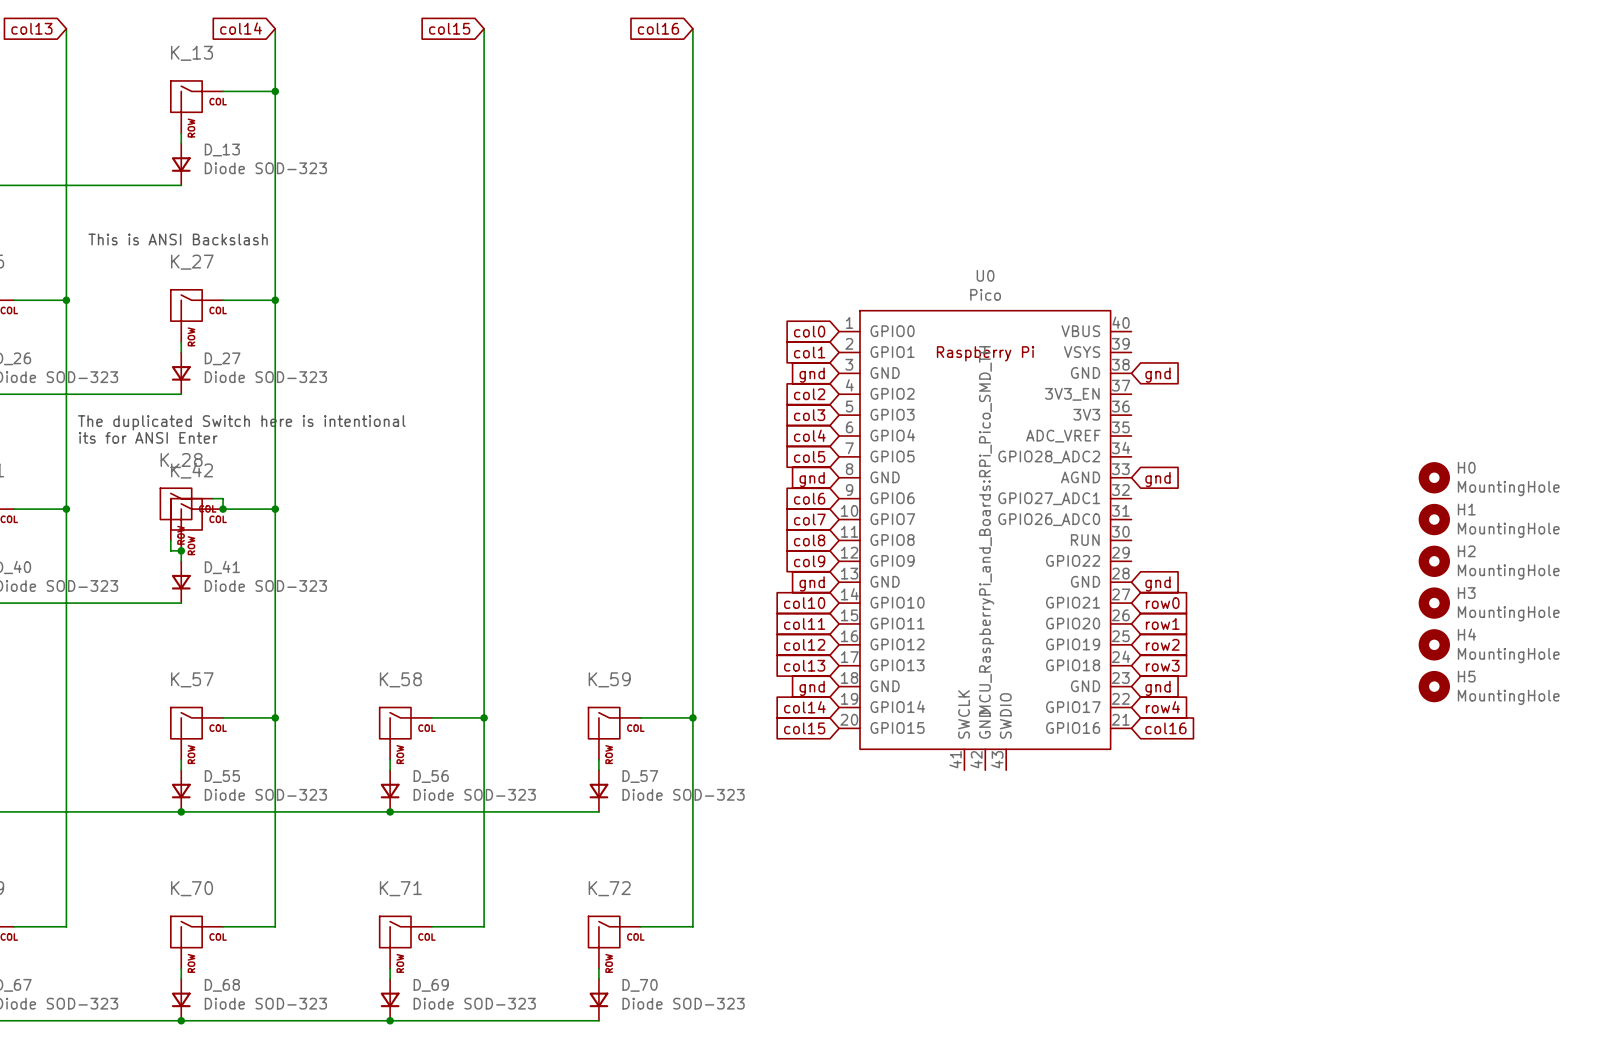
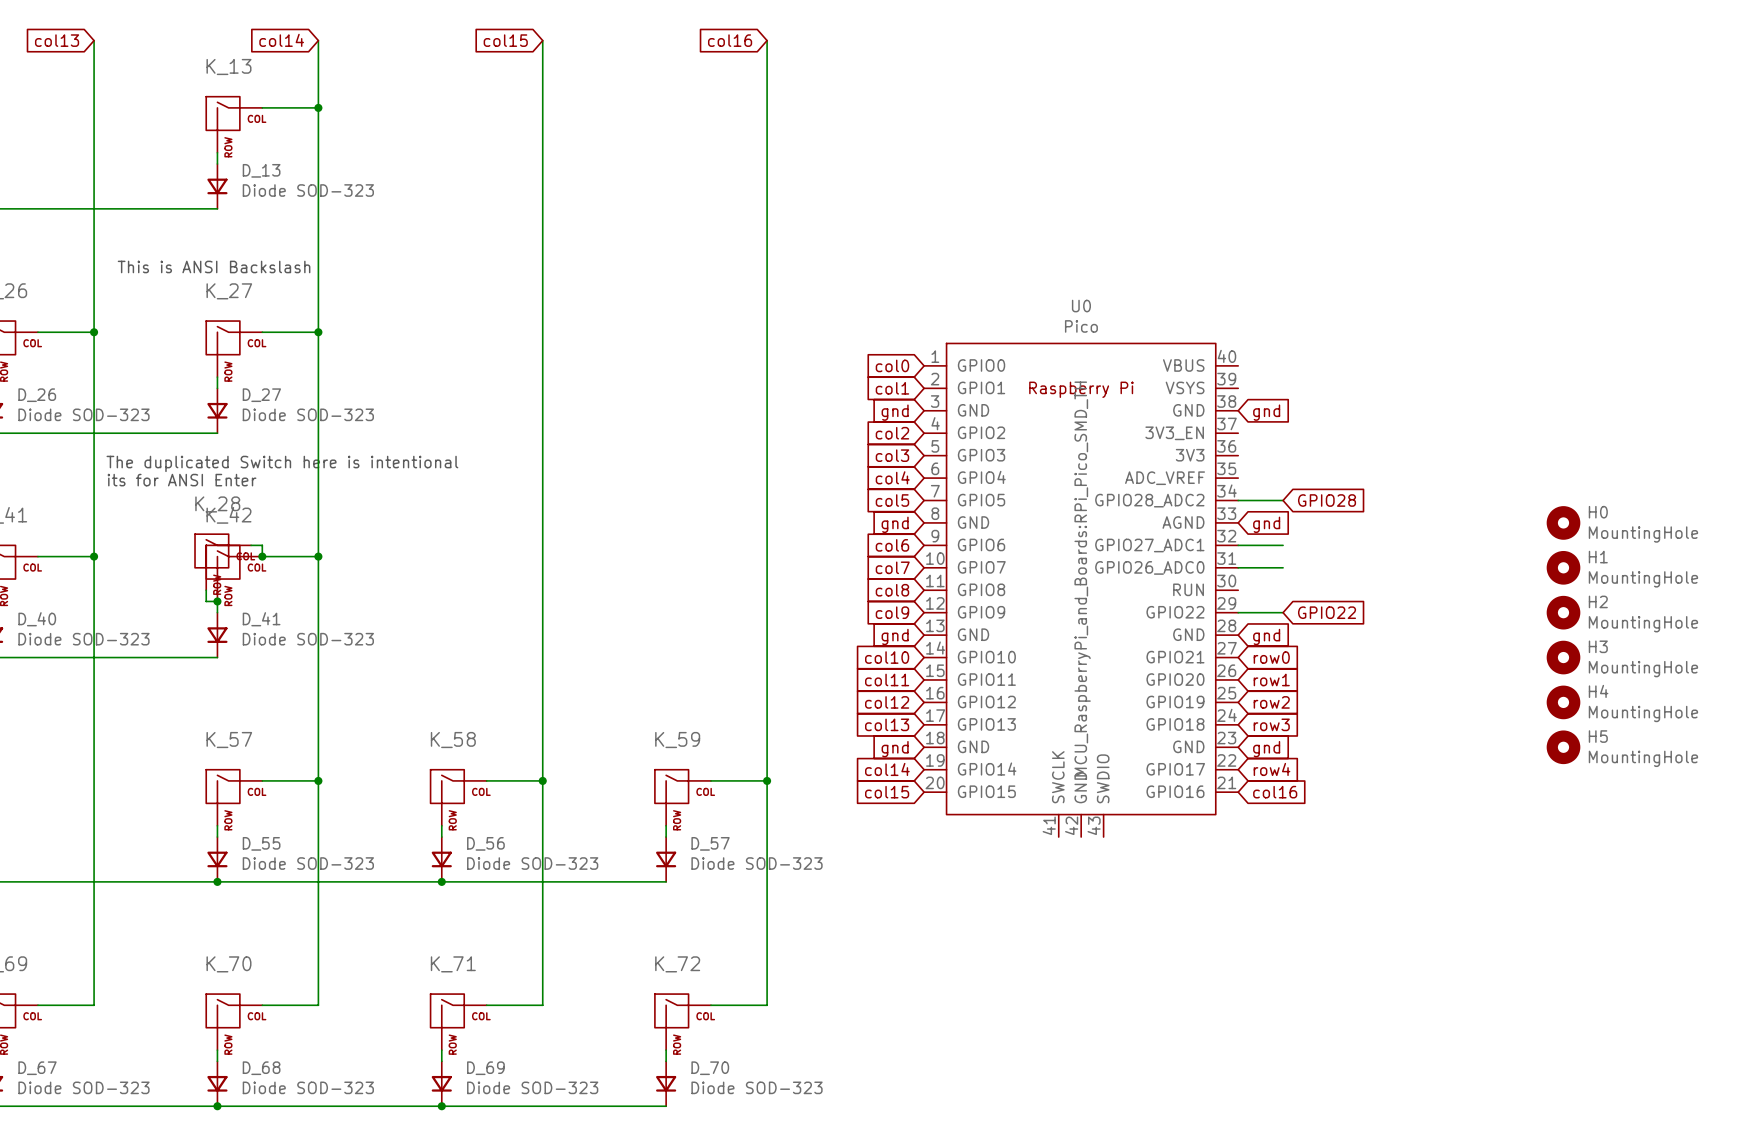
wire: none -> (1238, 500) (1283, 500)
global label: none -> GPIO28 (1327, 500)
wire: none -> (1238, 545) (1283, 545)
wire: none -> (1238, 567) (1283, 567)
wire: none -> (1238, 612) (1283, 612)
global label: none -> GPIO22 (1327, 612)

